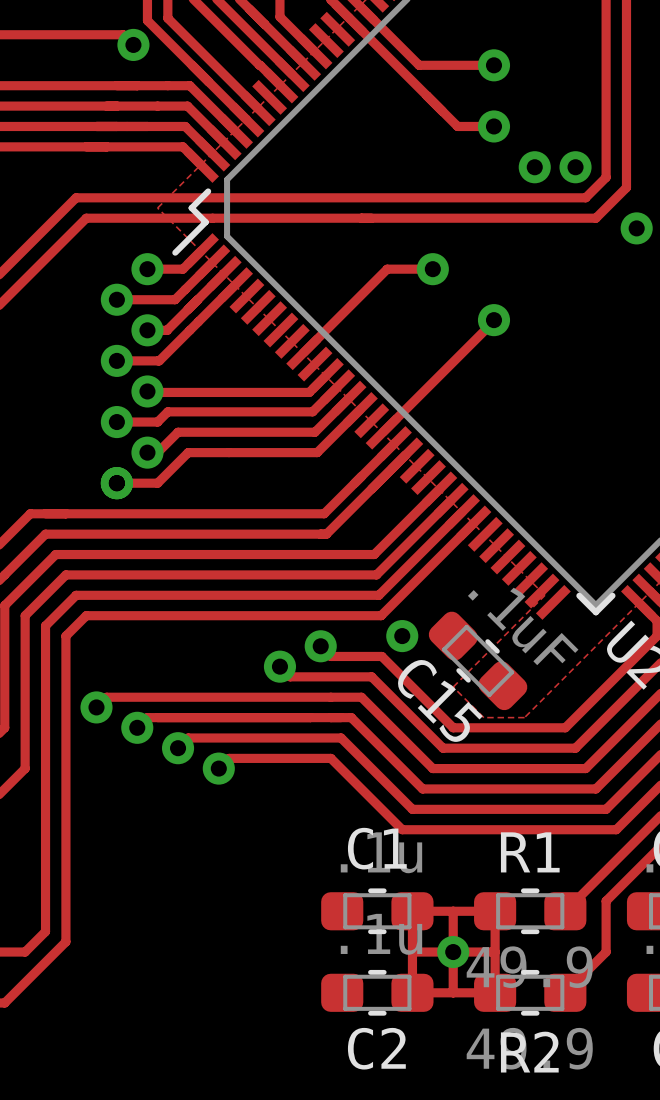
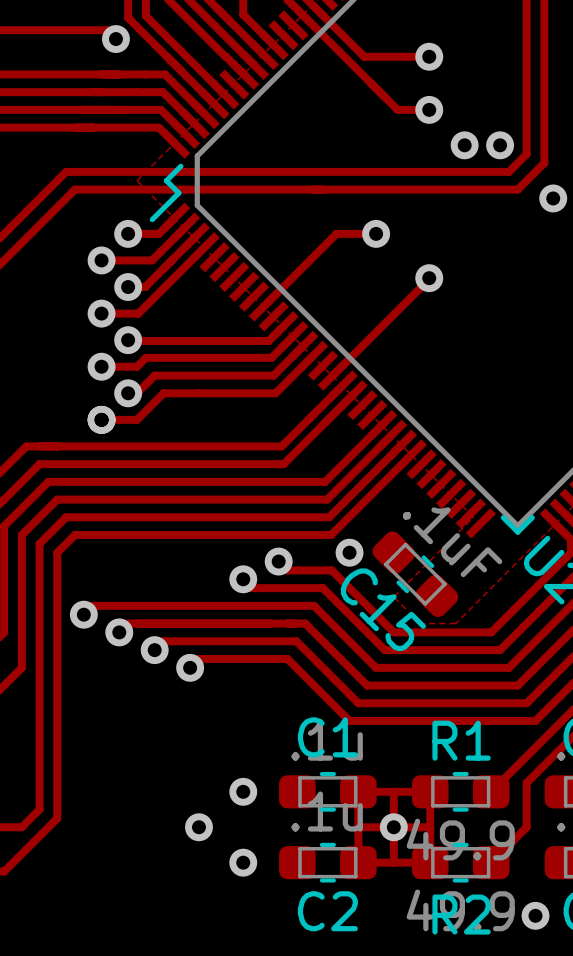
via: none -> (243, 791)
via: none -> (198, 827)
via: none -> (243, 862)
via: none -> (535, 915)

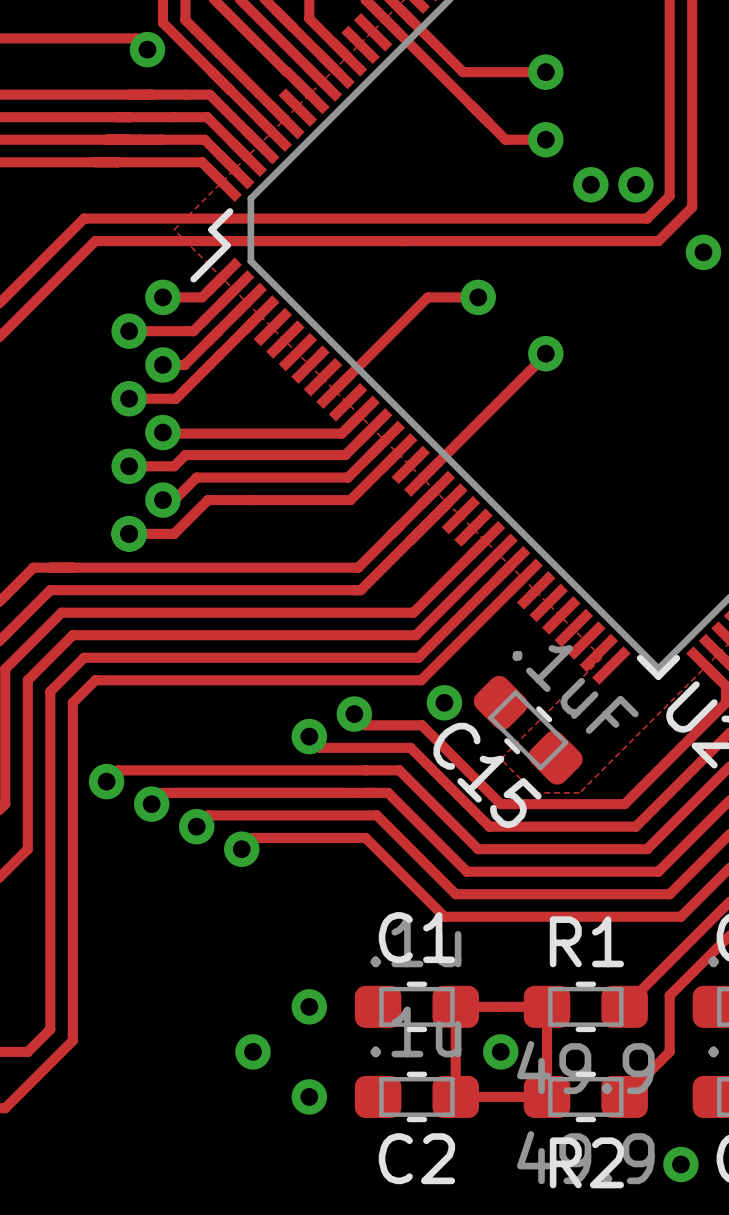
track: (393, 791) (393, 862) -> none
track: (358, 827) (430, 827) -> none

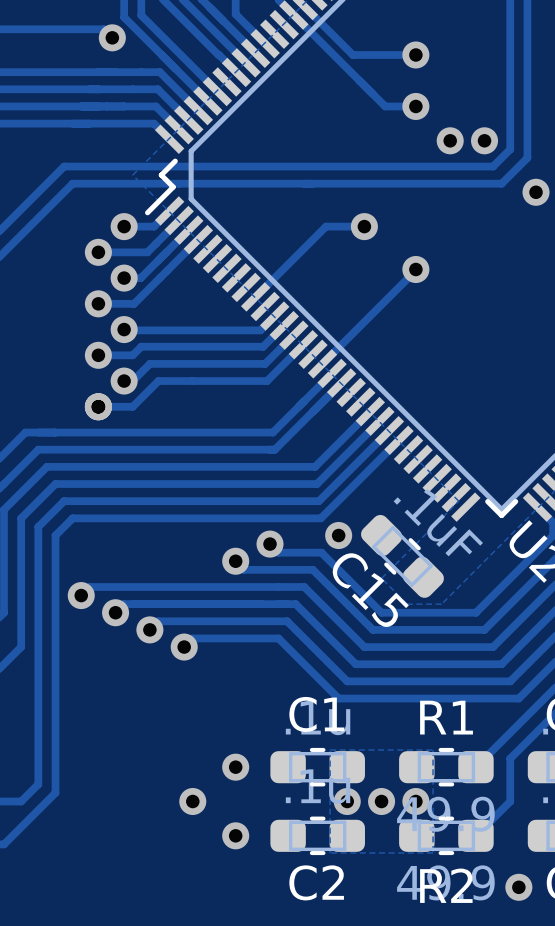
zone outline: none -> (330, 750) (433, 750) (433, 852) (330, 852) (330, 750)
track: (455, 1006) (547, 1006) (547, 1096) (455, 1096) (455, 1006) -> none
via: none -> (347, 801)
via: none -> (415, 801)

